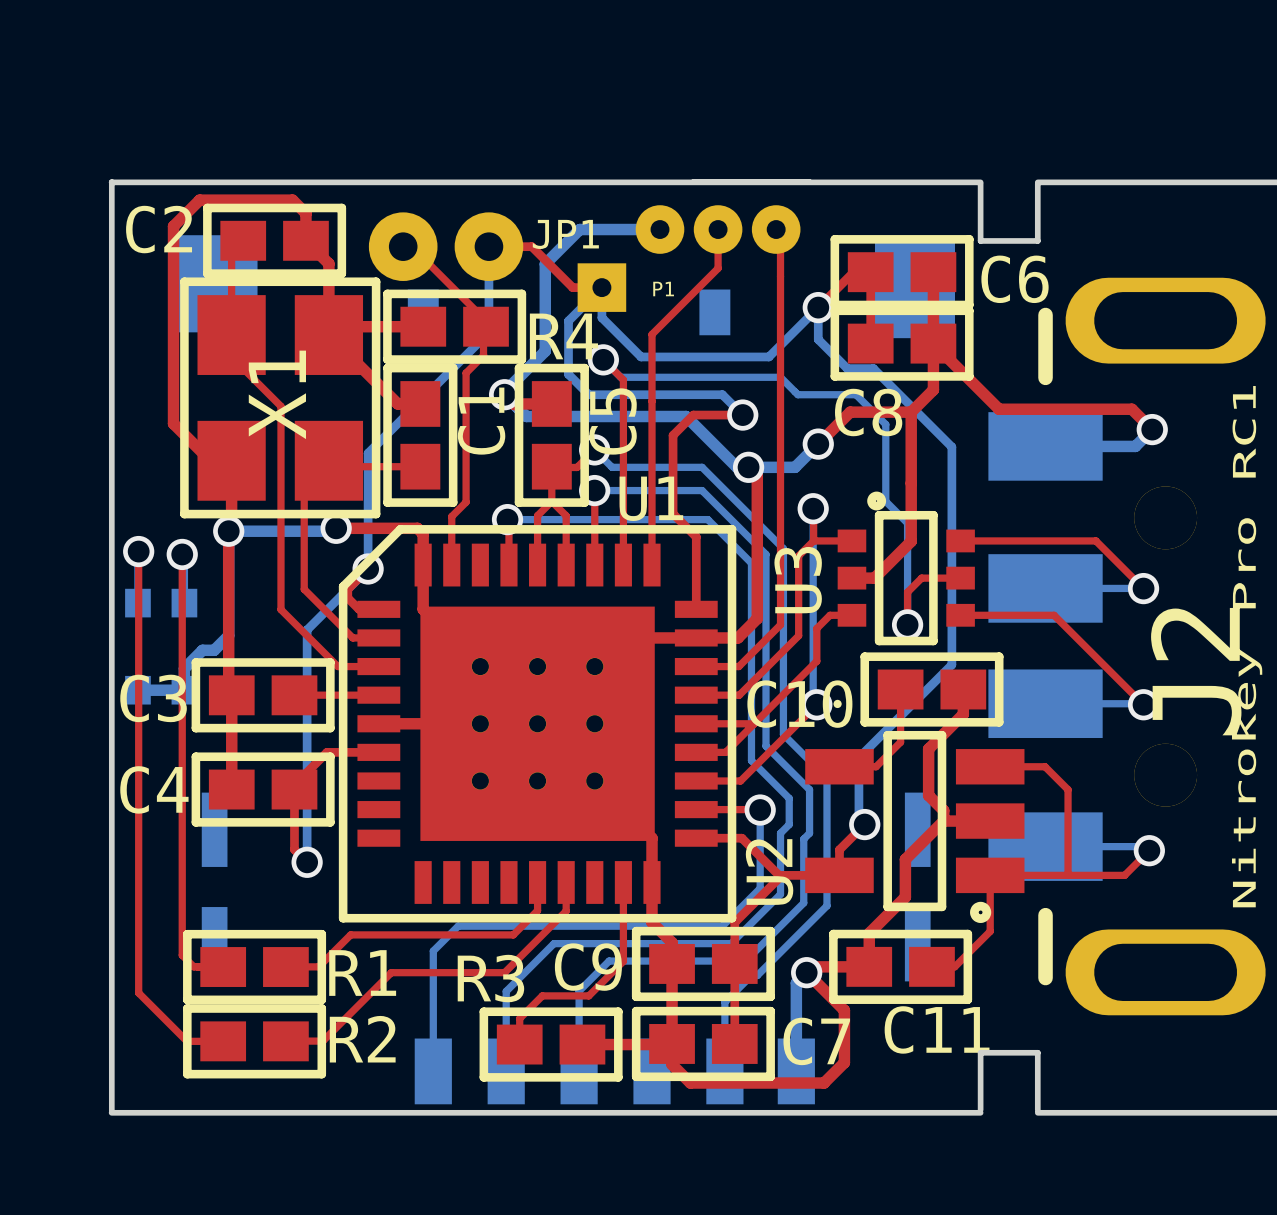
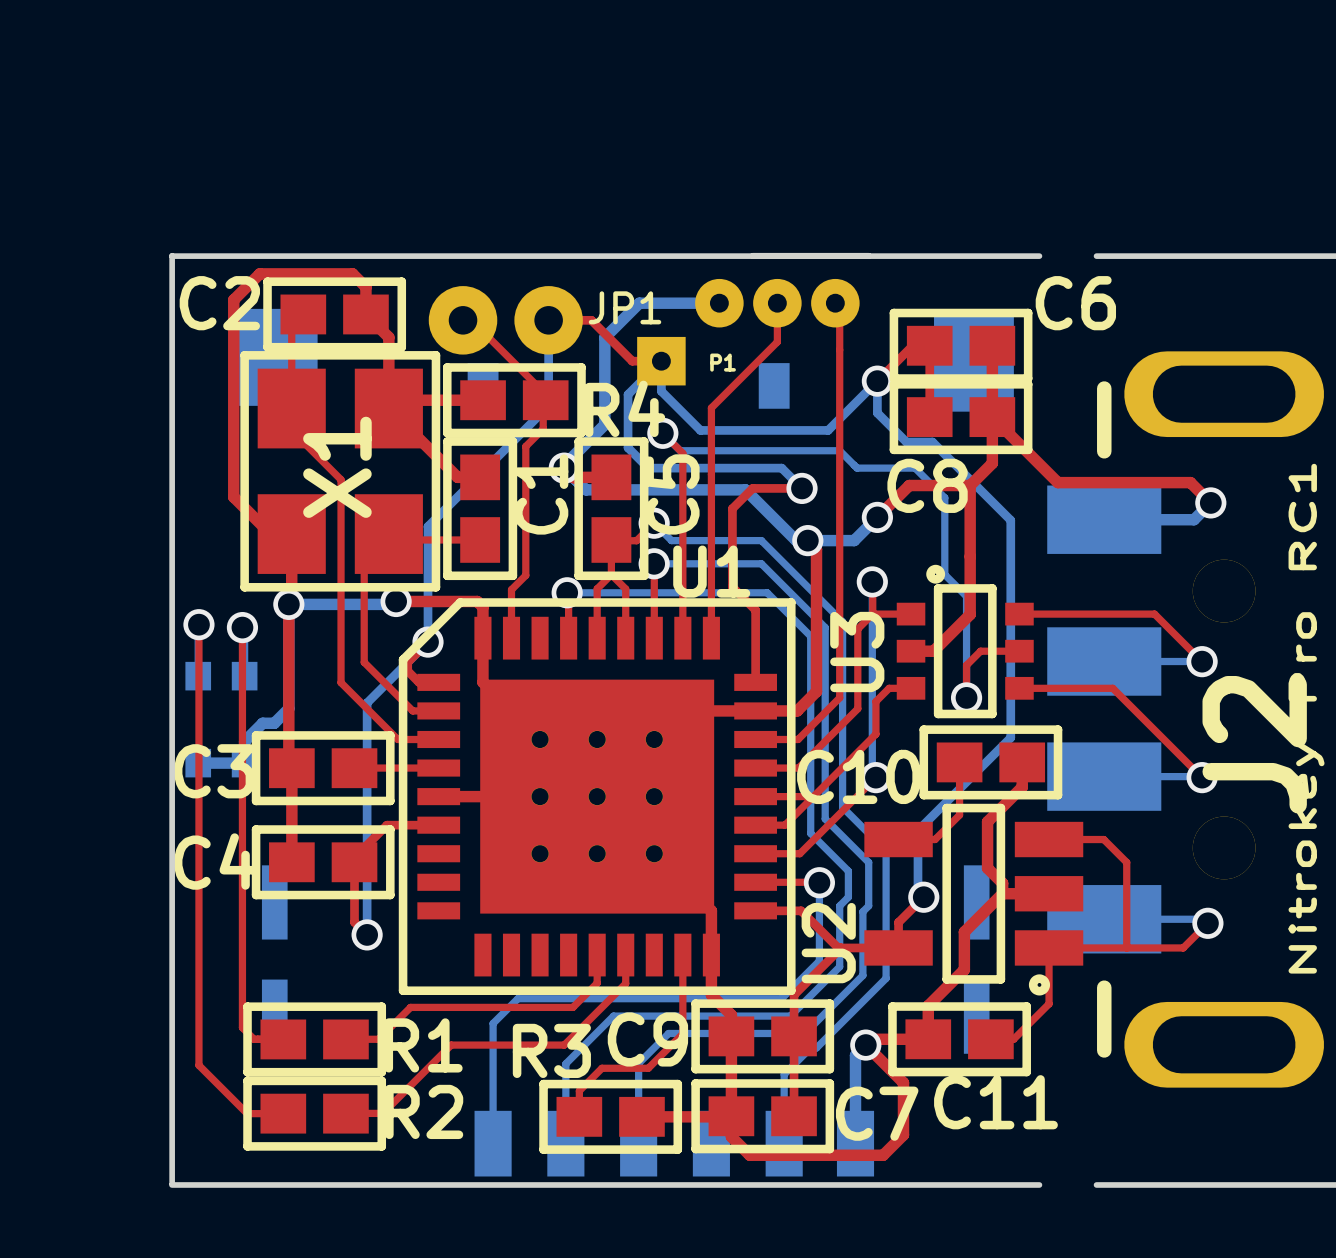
board edge: (980, 183) (980, 240) (1037, 240) (1037, 183) -> none
C6 name position: C6 (1015, 279) -> C6 (1075, 303)
board edge: (980, 1109) (980, 1052) (1037, 1052) (1037, 1109) -> none

